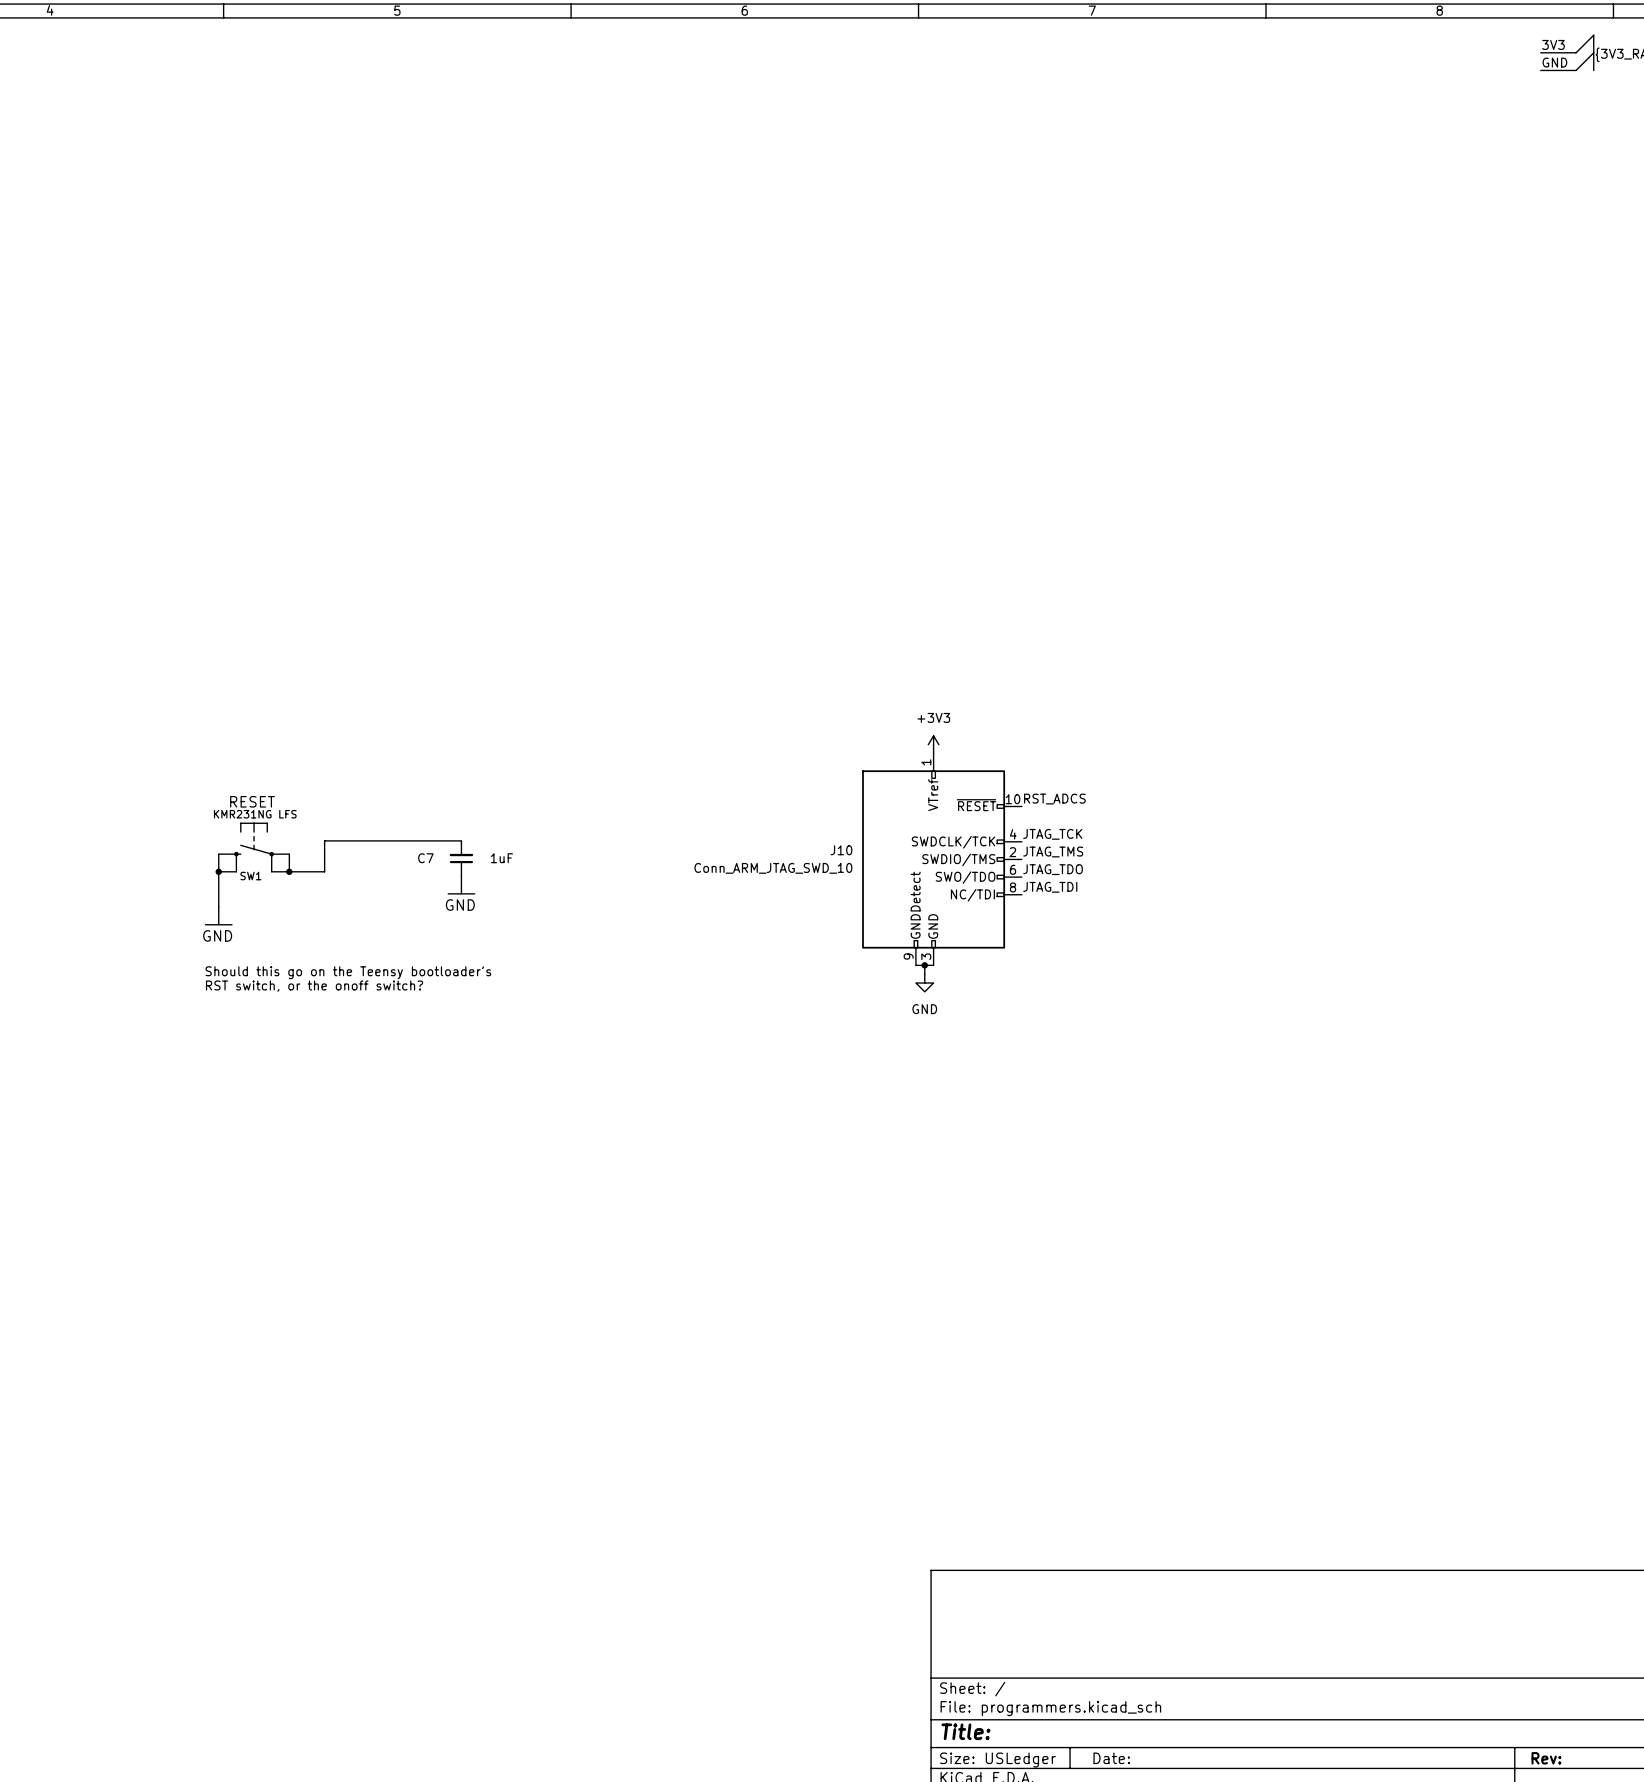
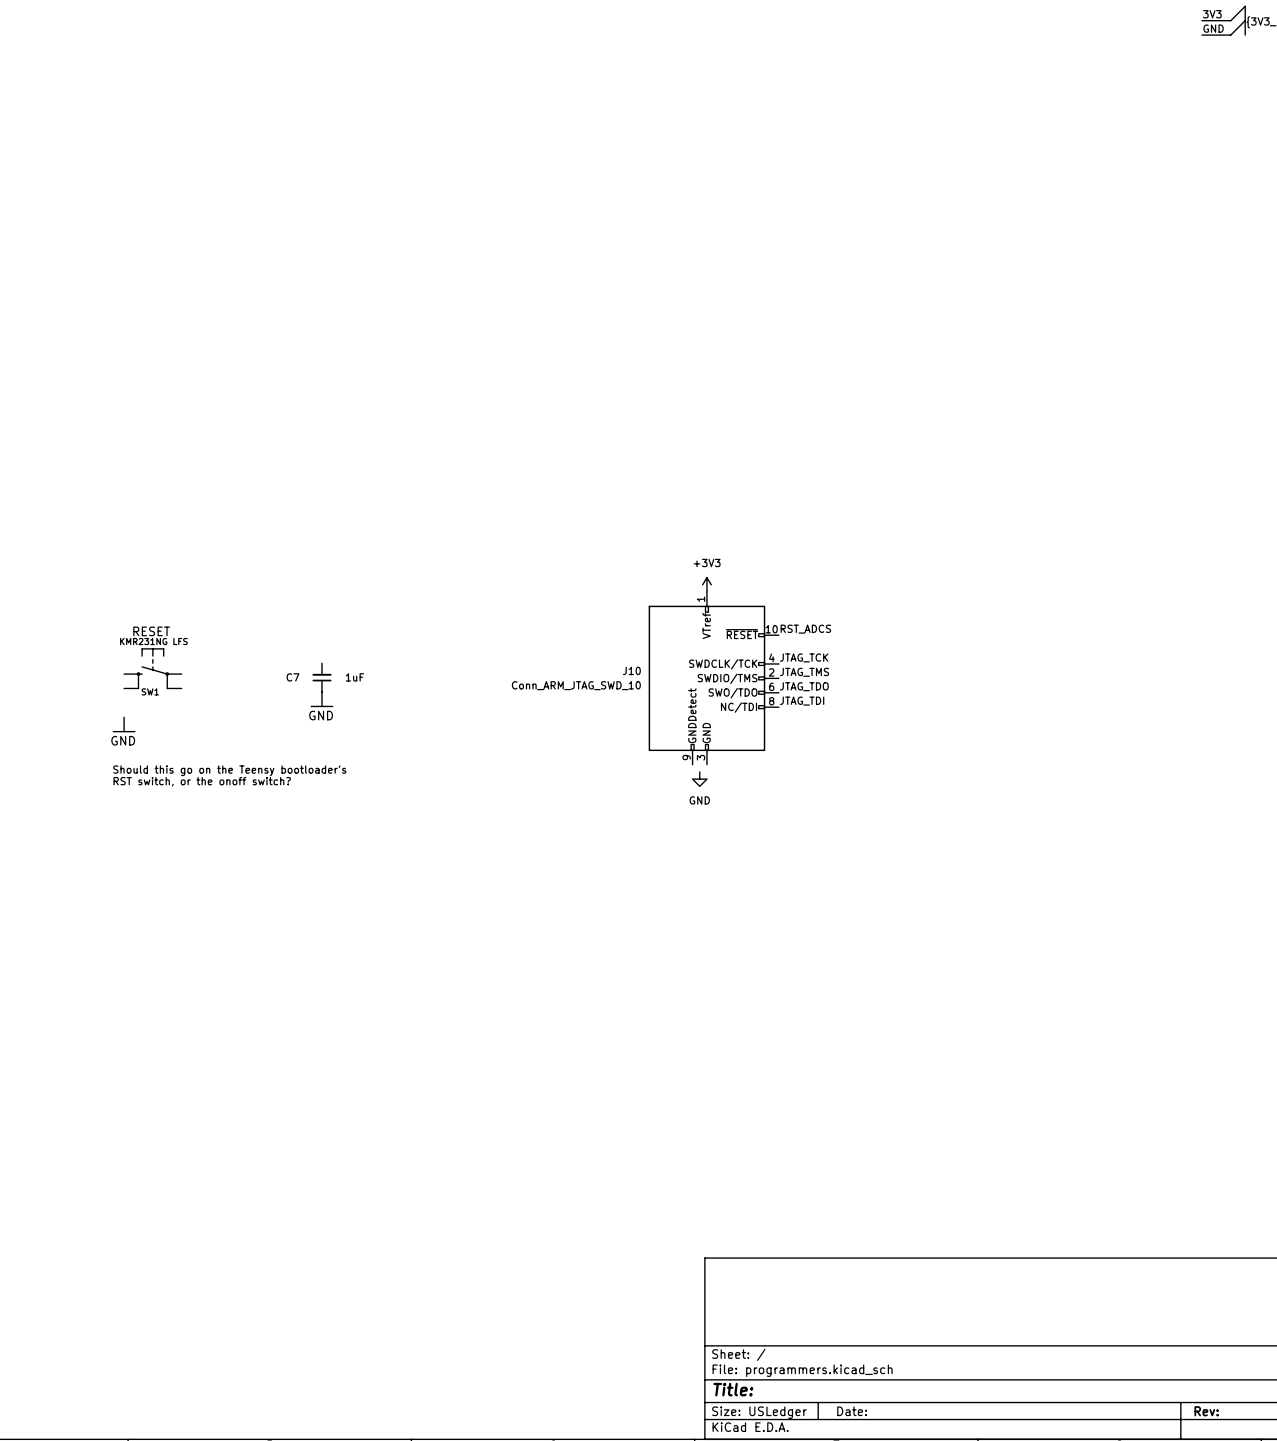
wire: (461, 840) (324, 840) (324, 871) (289, 871) (289, 854) -> none
wire: (218, 854) (218, 907) -> none
junction: (218, 871) -> none
junction: (289, 871) -> none
wire: (915, 965) (933, 965) -> none
wire: (924, 965) (924, 974) -> none
junction: (924, 965) -> none

